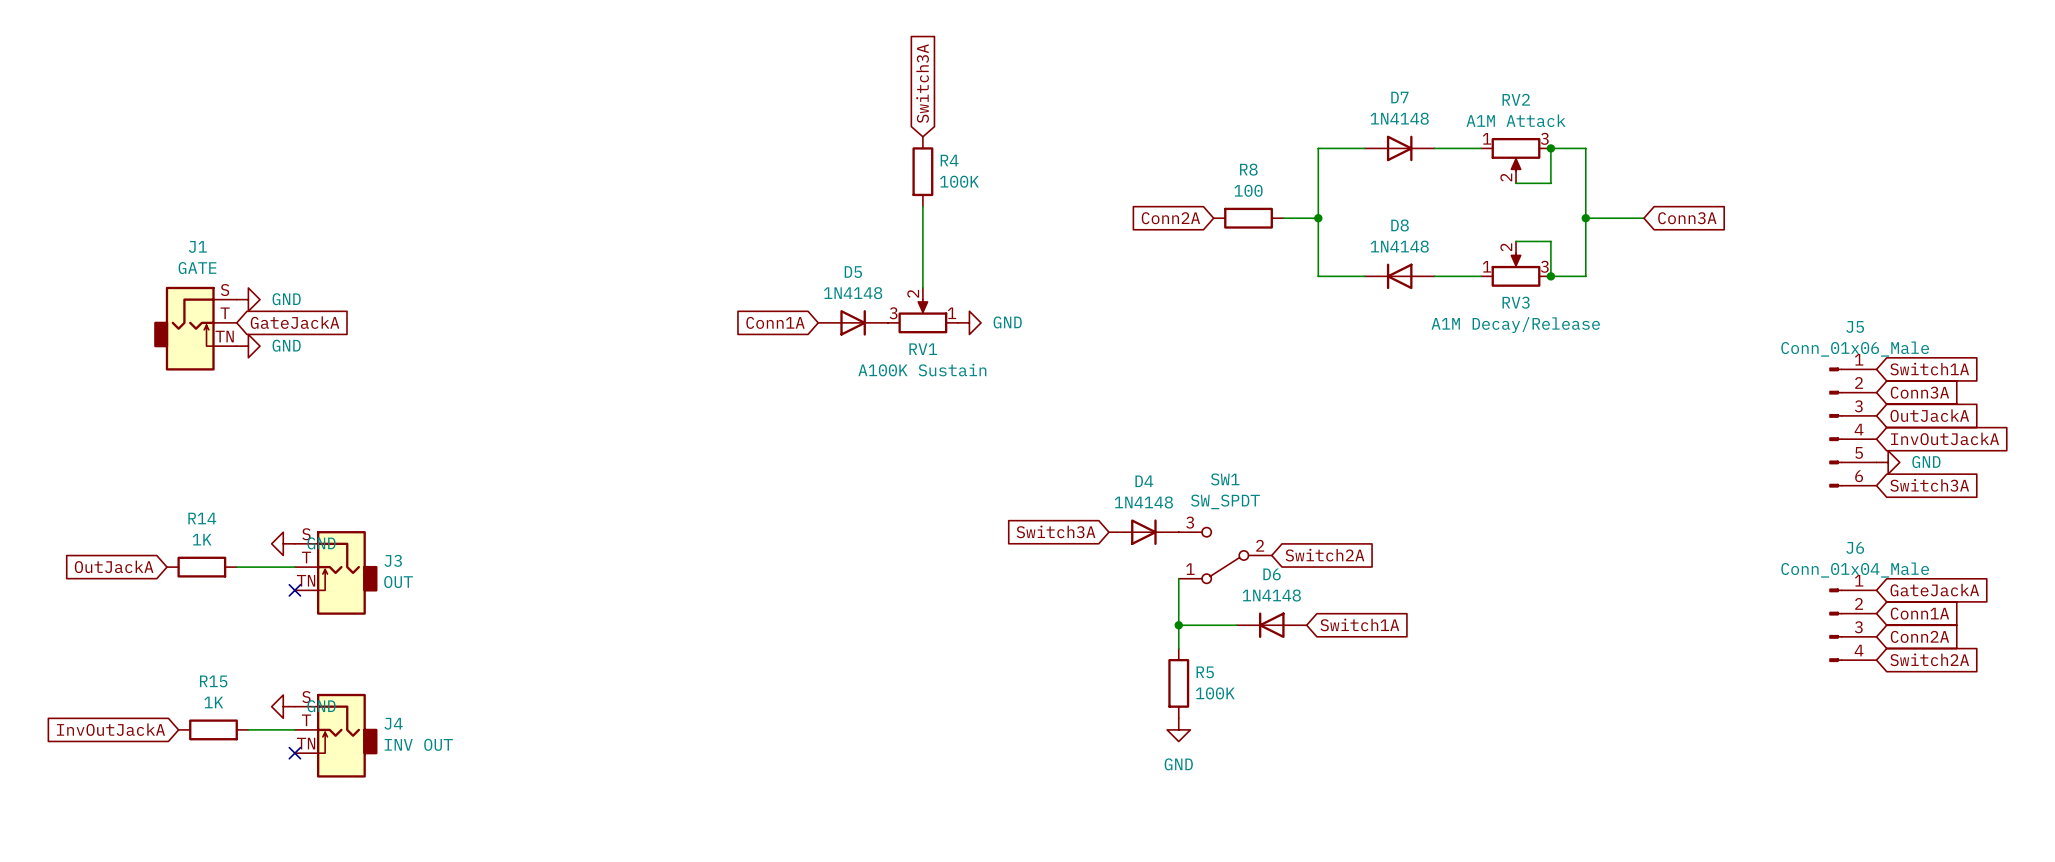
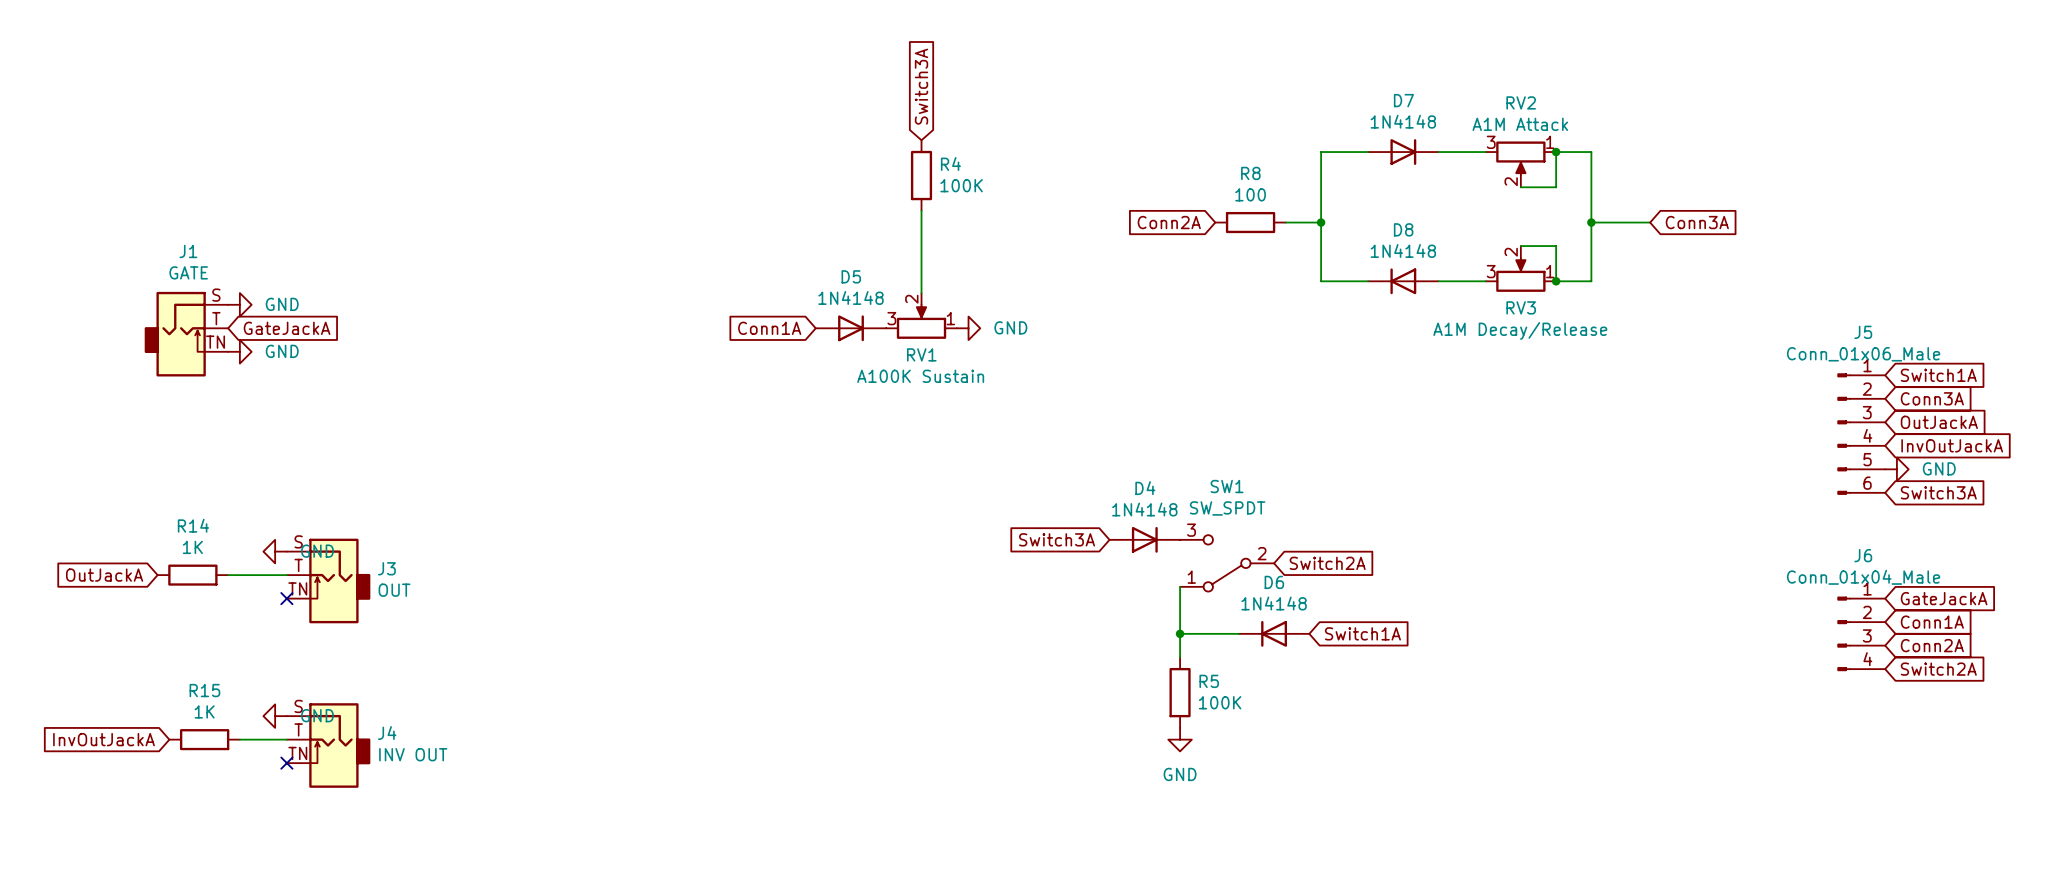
RV2 flip: as is (1516, 154) -> left-right (1520, 158)
RV3 flip: as is (1516, 269) -> left-right (1520, 274)

